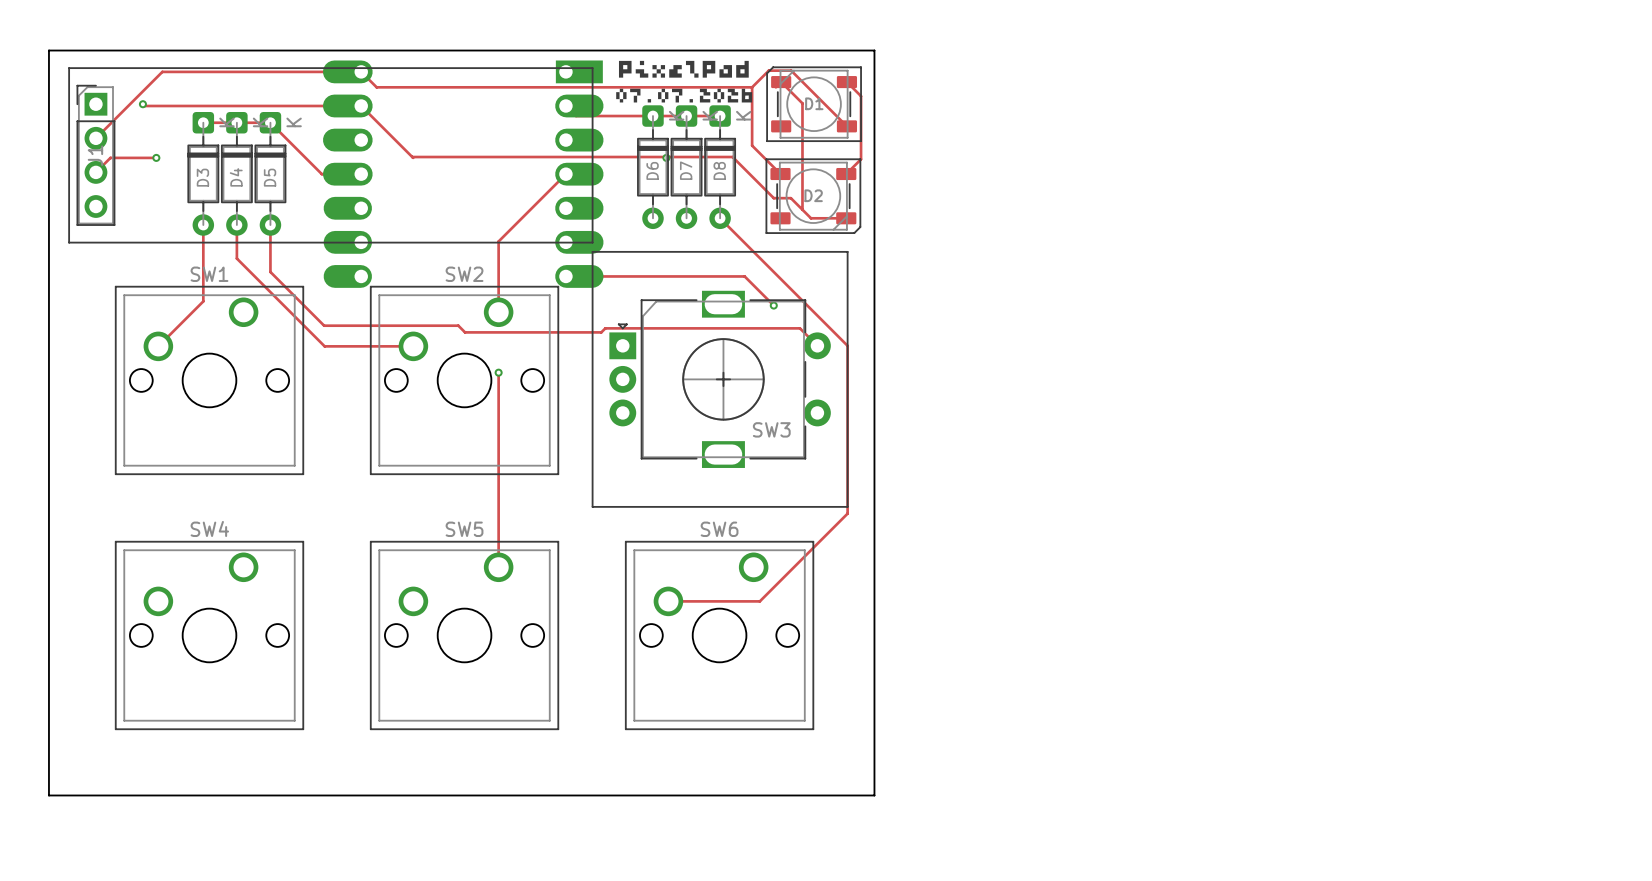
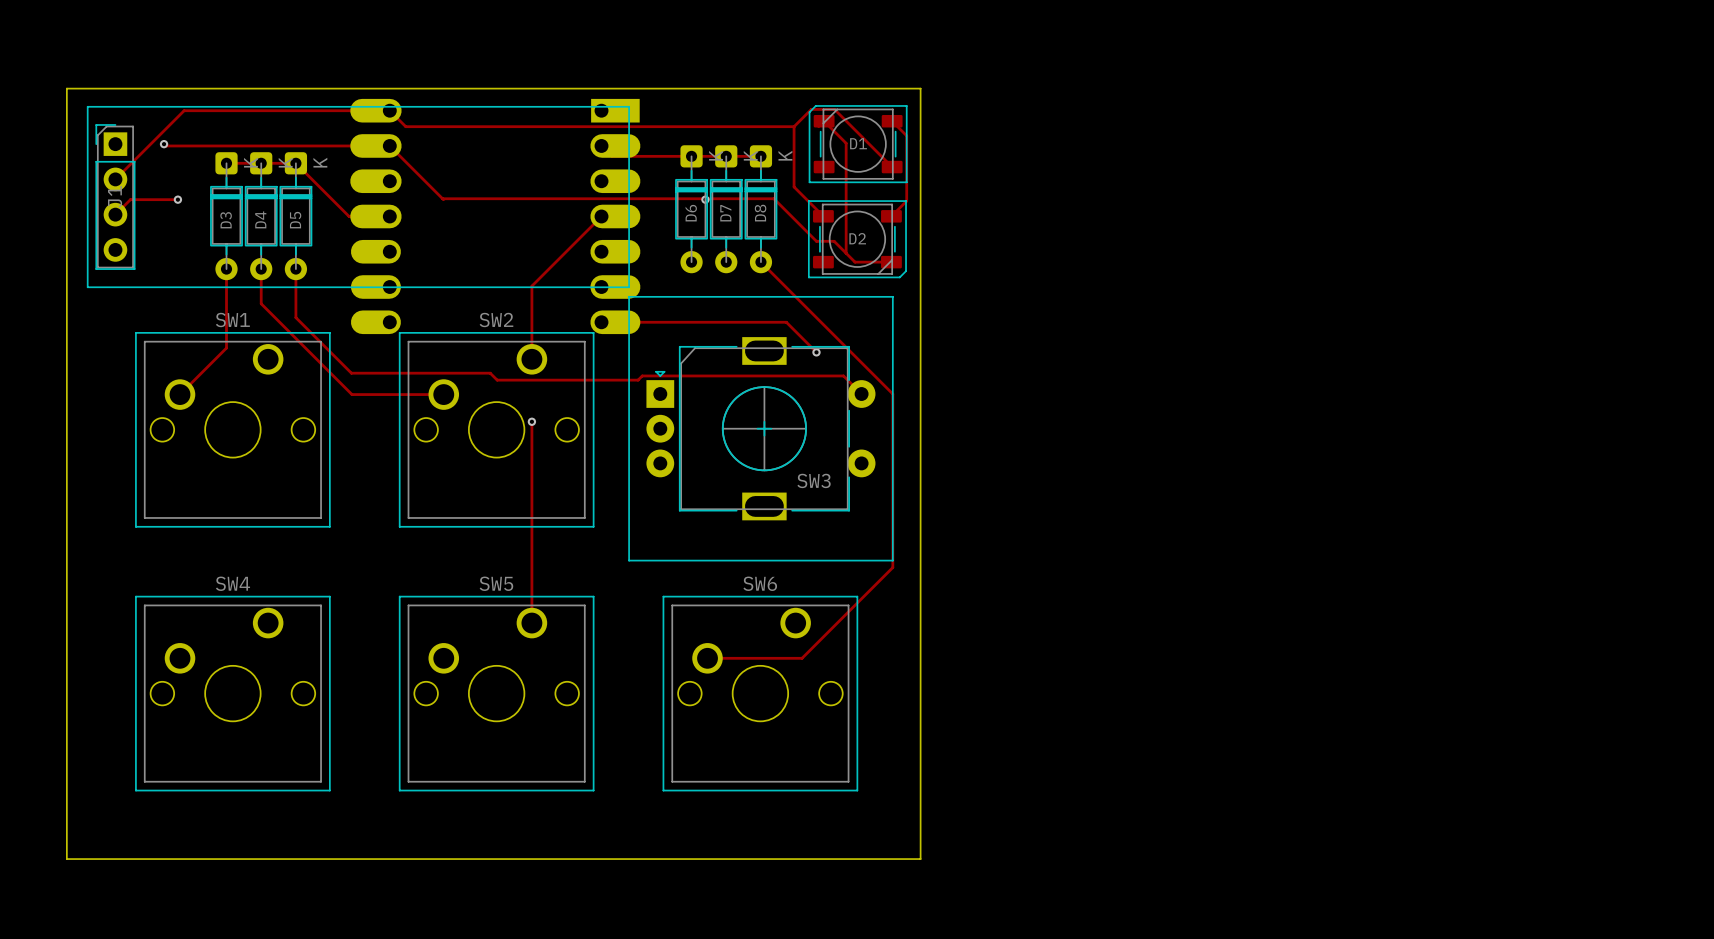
drawing: [616, 60, 753, 103] -> none

